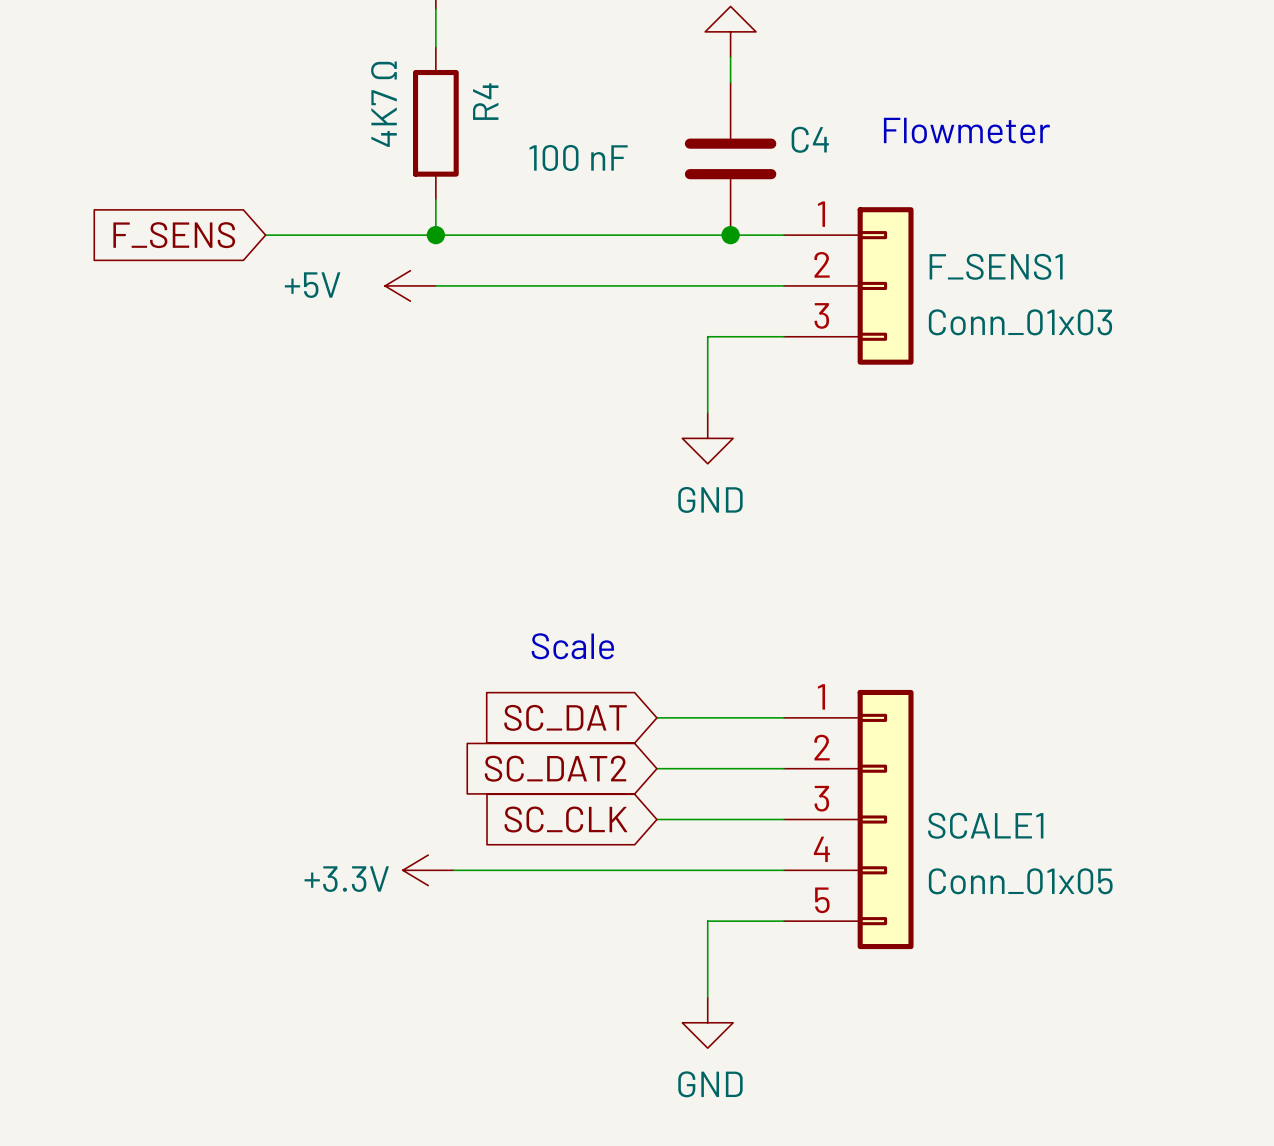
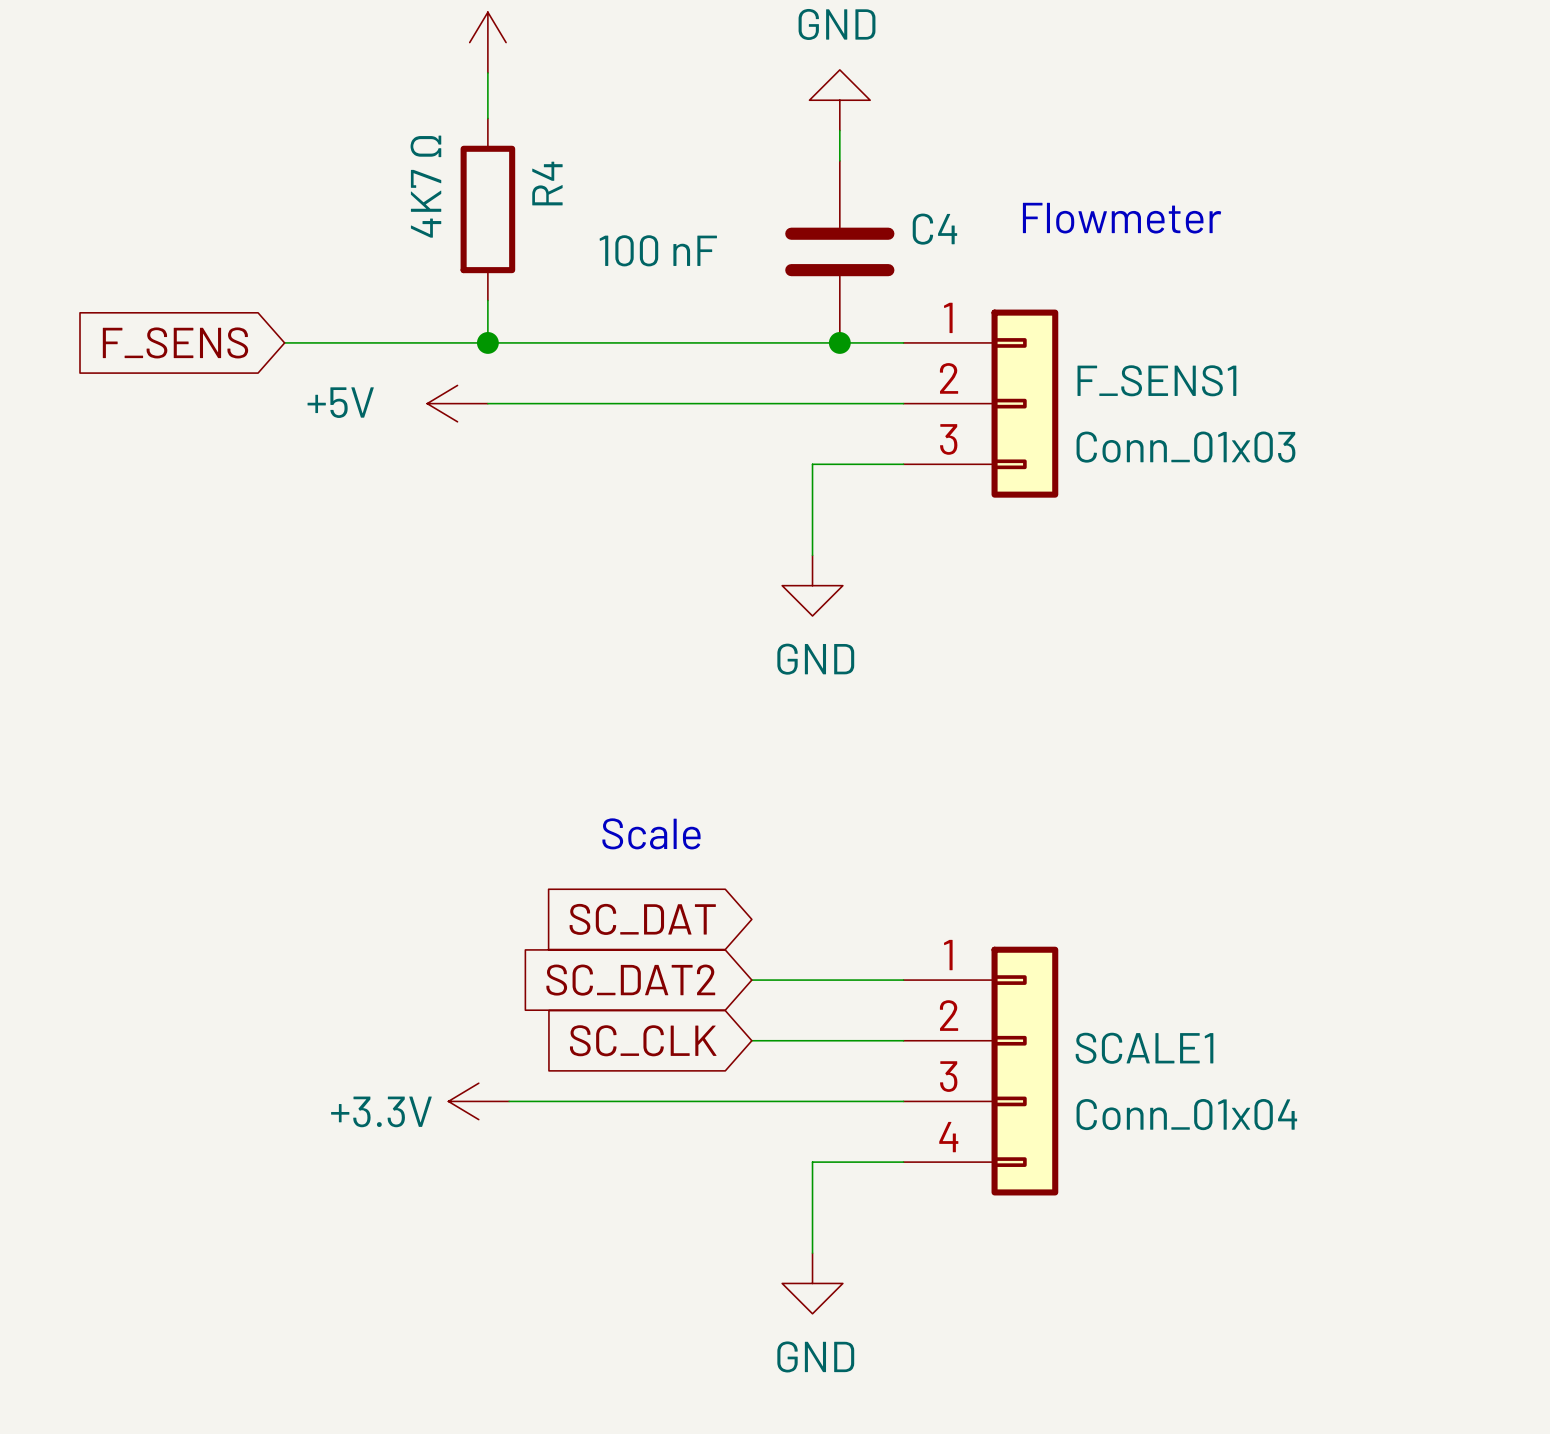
SCALE1 symbol: [783, 689, 914, 950] -> [903, 946, 1059, 1196]
wire: (656, 717) (783, 717) -> none
SCALE1 value: Conn_01x05 (1020, 881) -> Conn_01x04 (1186, 1114)

